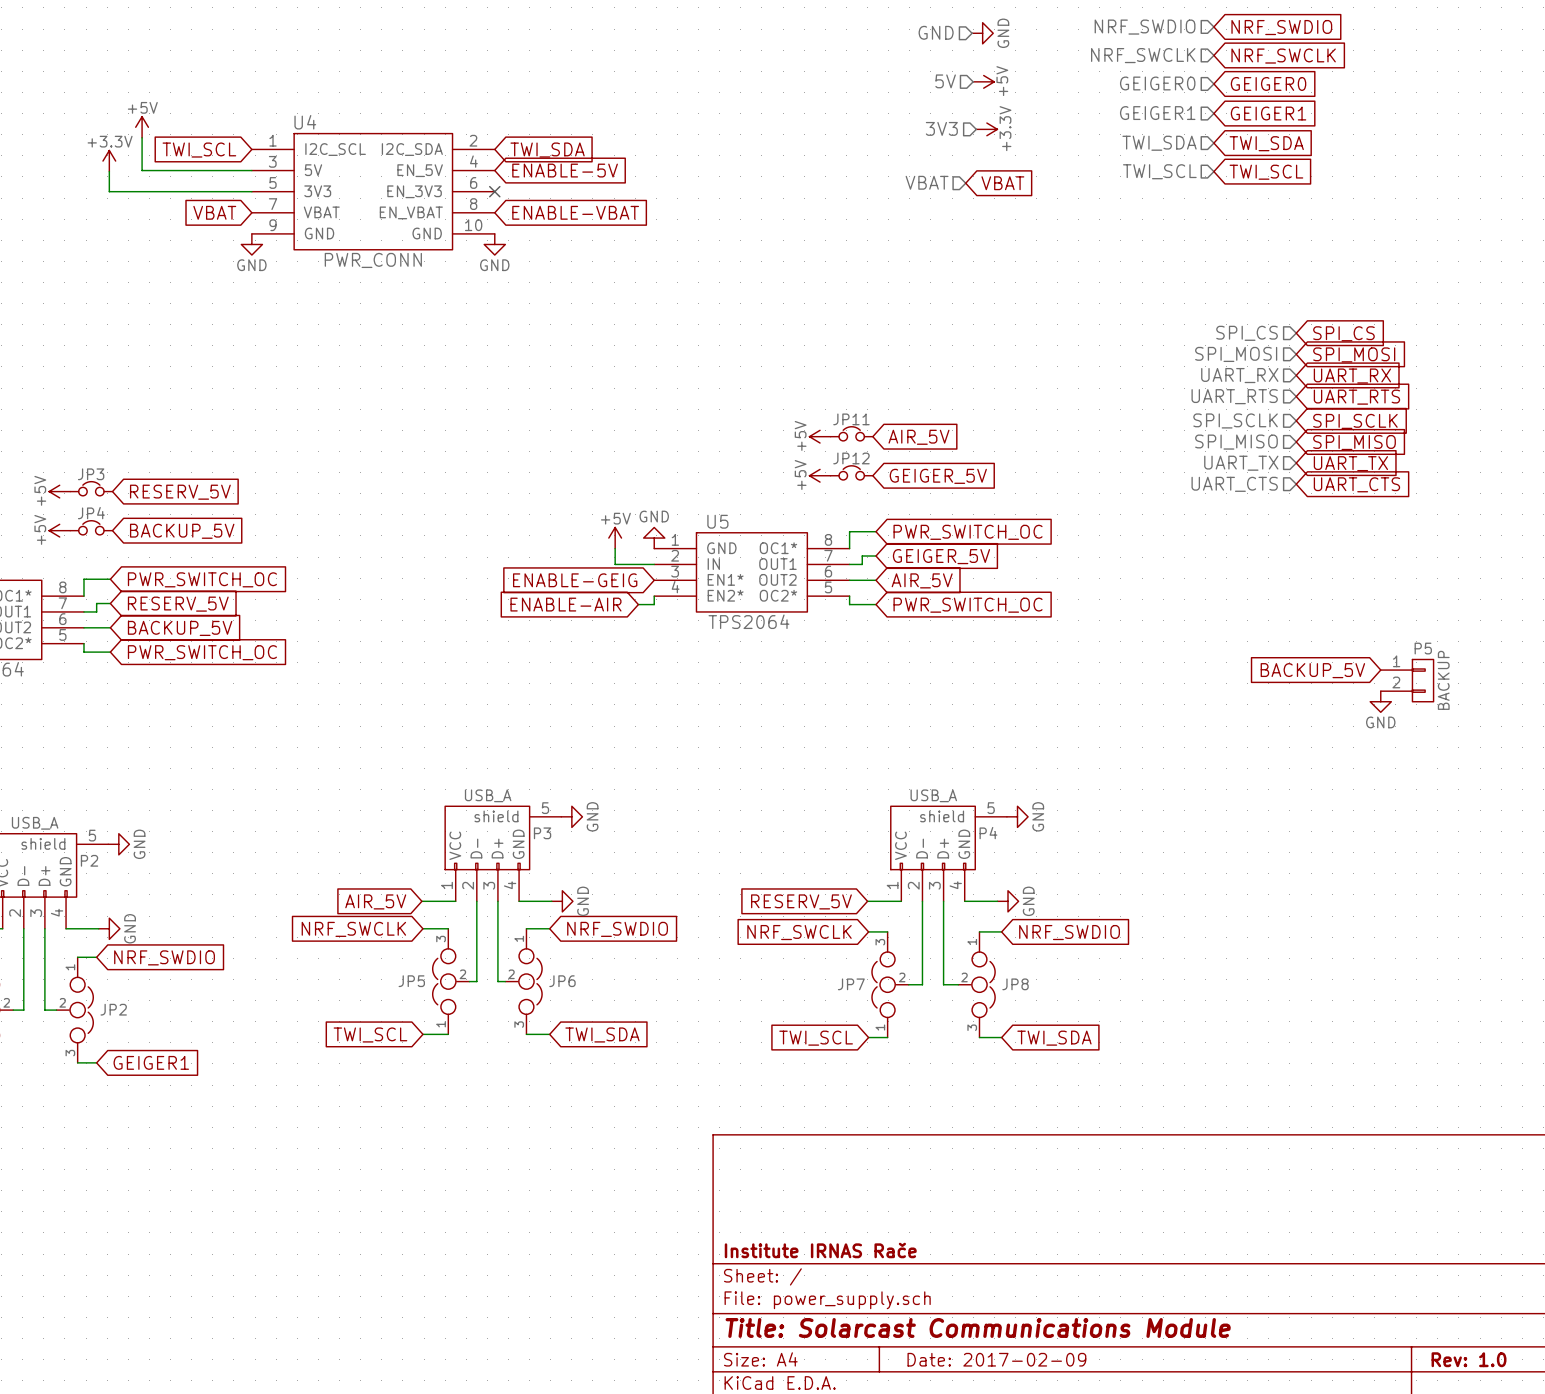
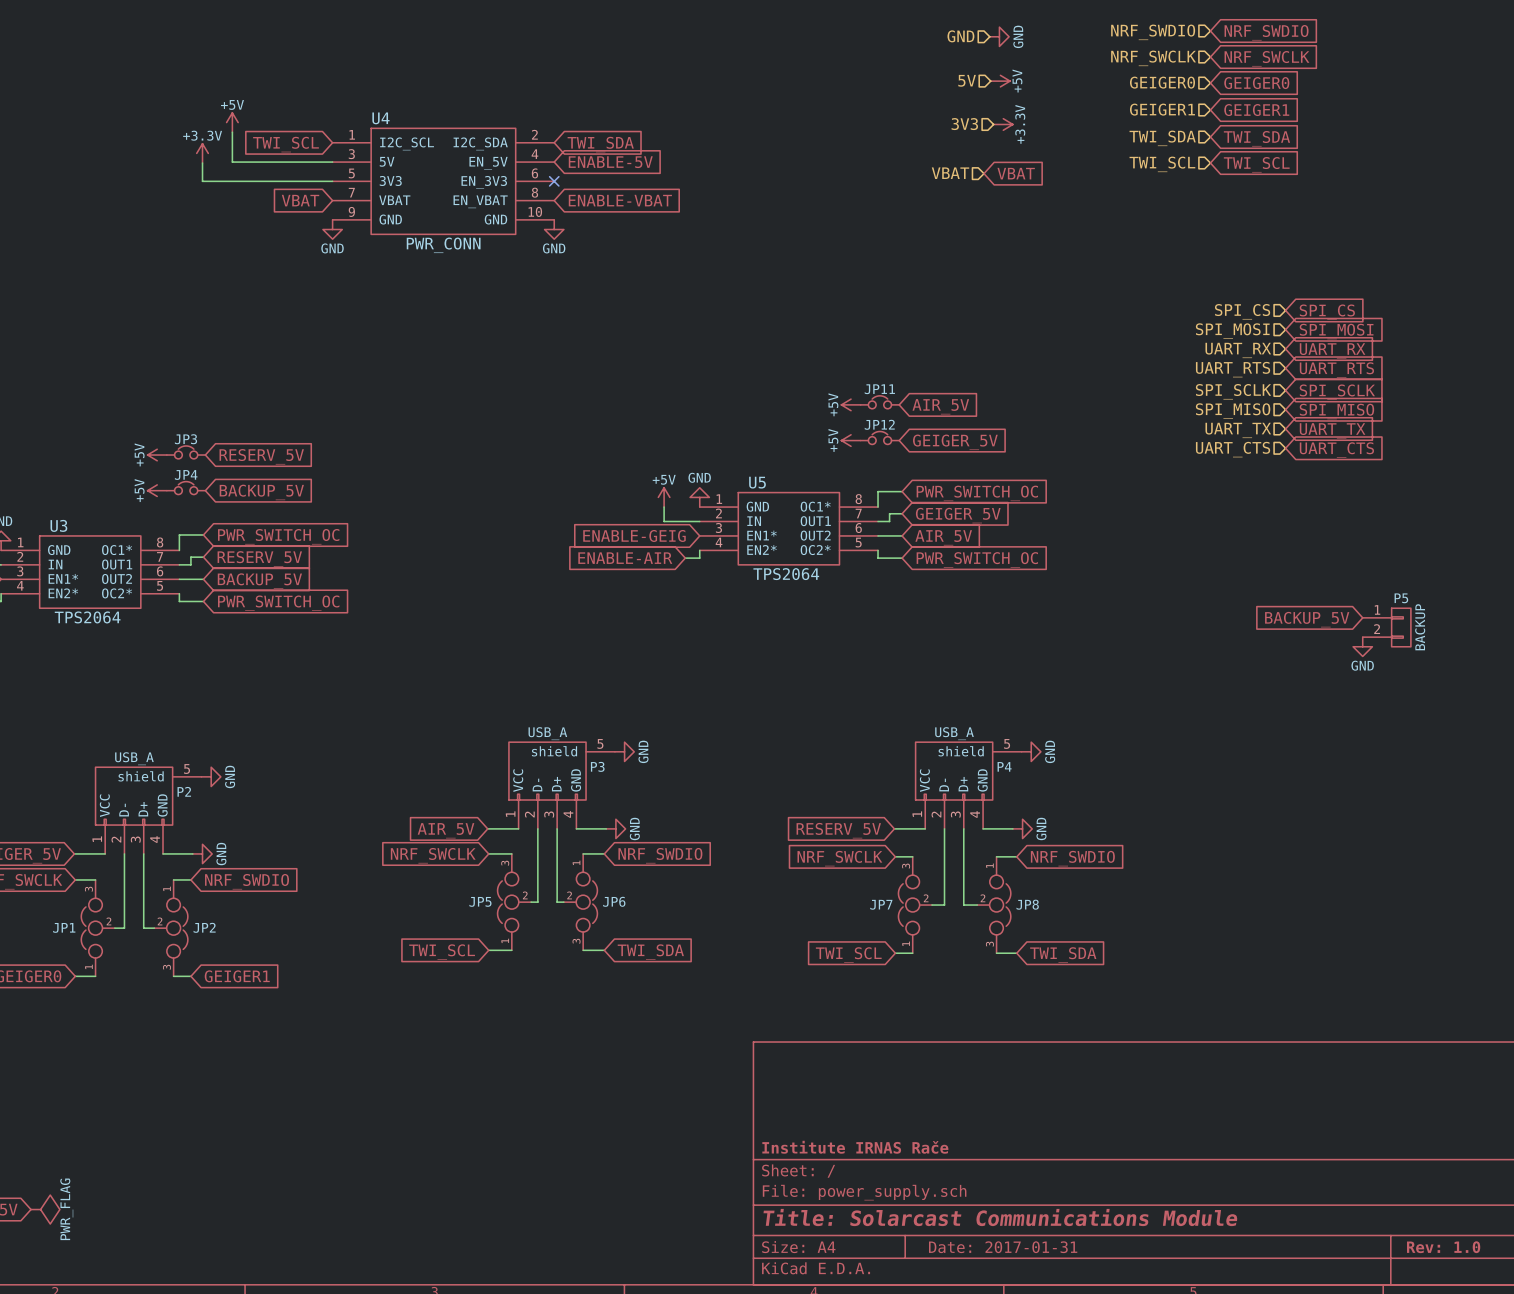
title block: Date: 2017-02-09 (996, 1359) -> Date: 2017-01-31 (1003, 1247)

